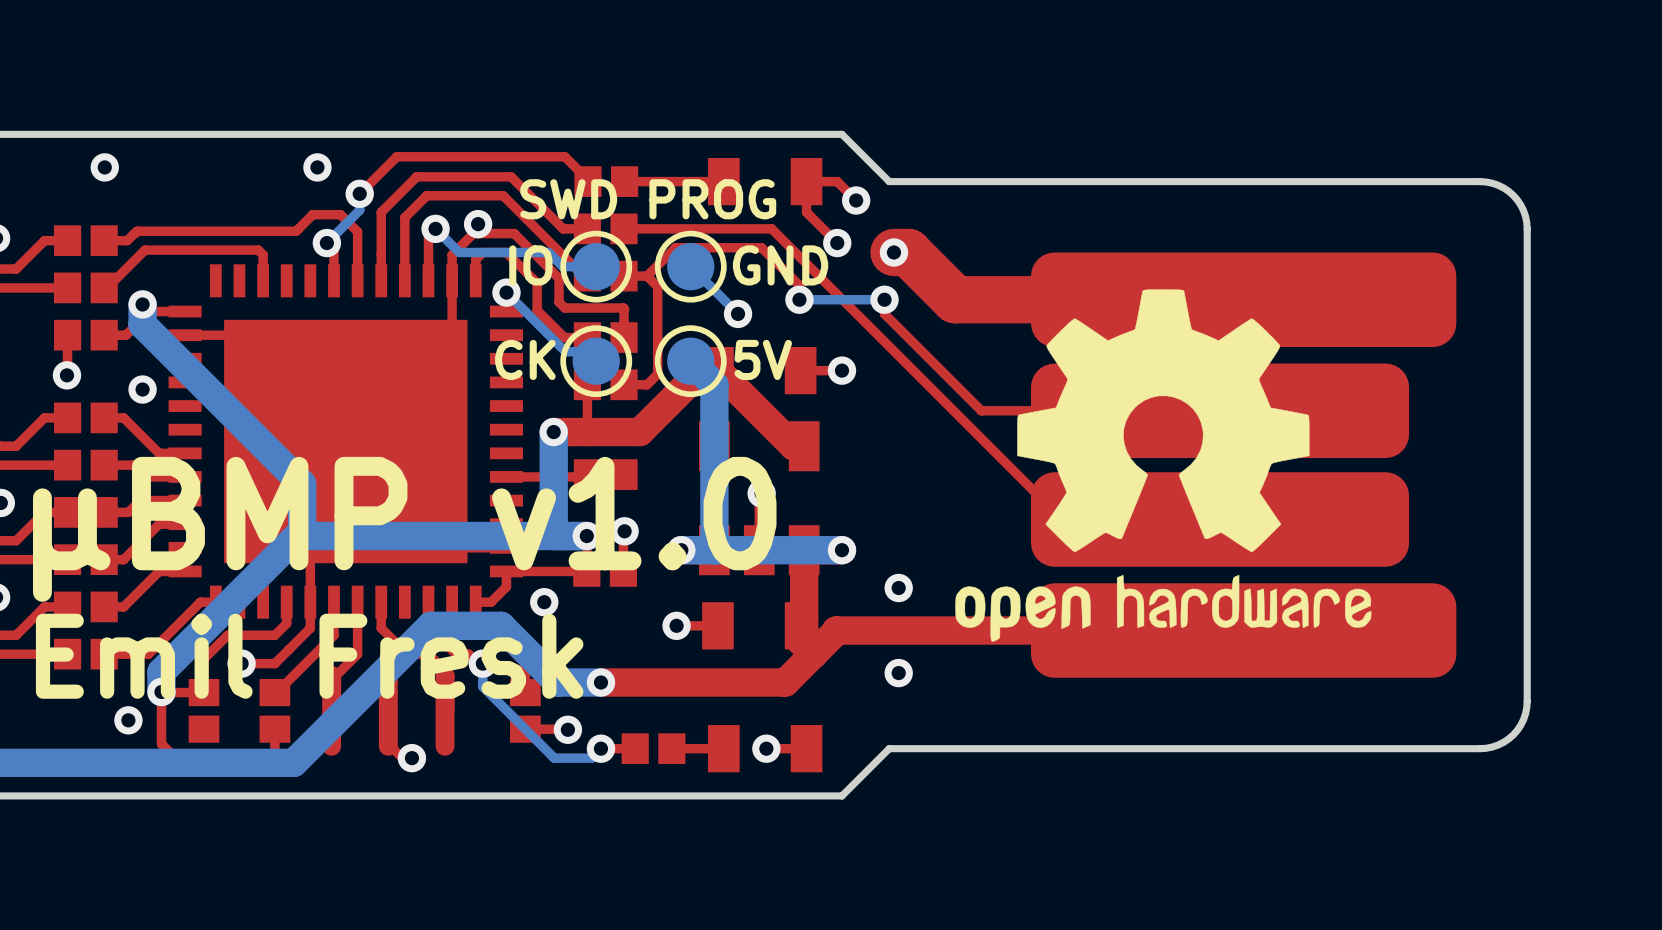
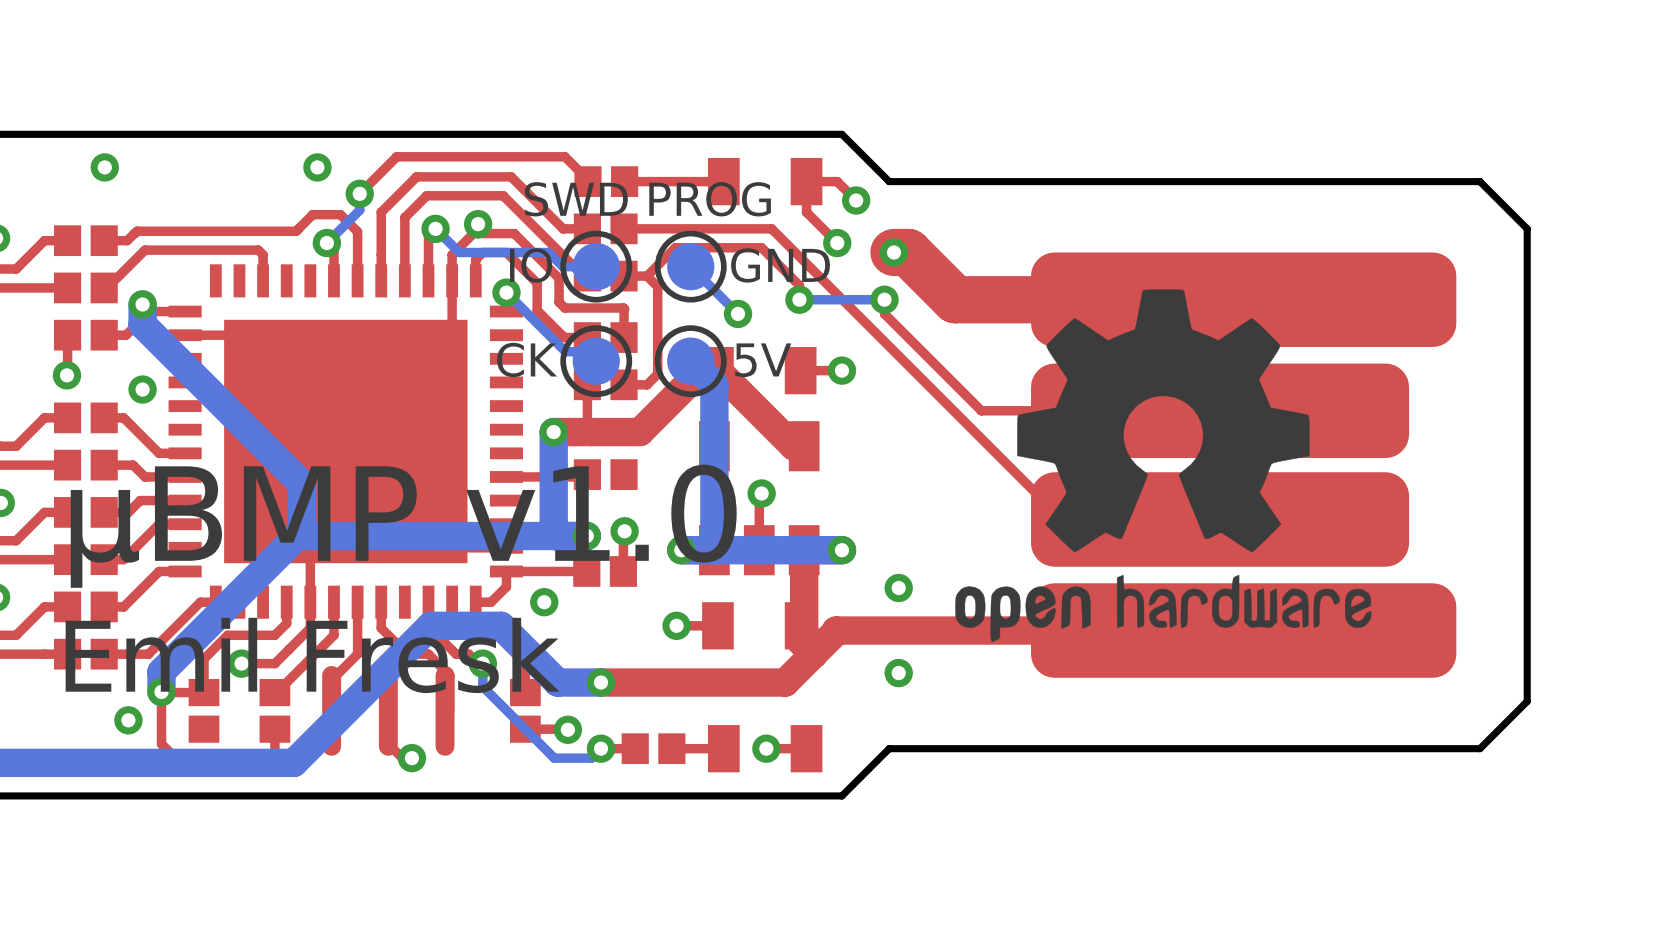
board edge: (1479, 181) (1498, 185) (1513, 195) (1523, 210) (1527, 228) -> (1479, 181) (1527, 228)
board edge: (1527, 701) (1523, 719) (1513, 734) (1498, 745) (1479, 748) -> (1527, 701) (1479, 748)

